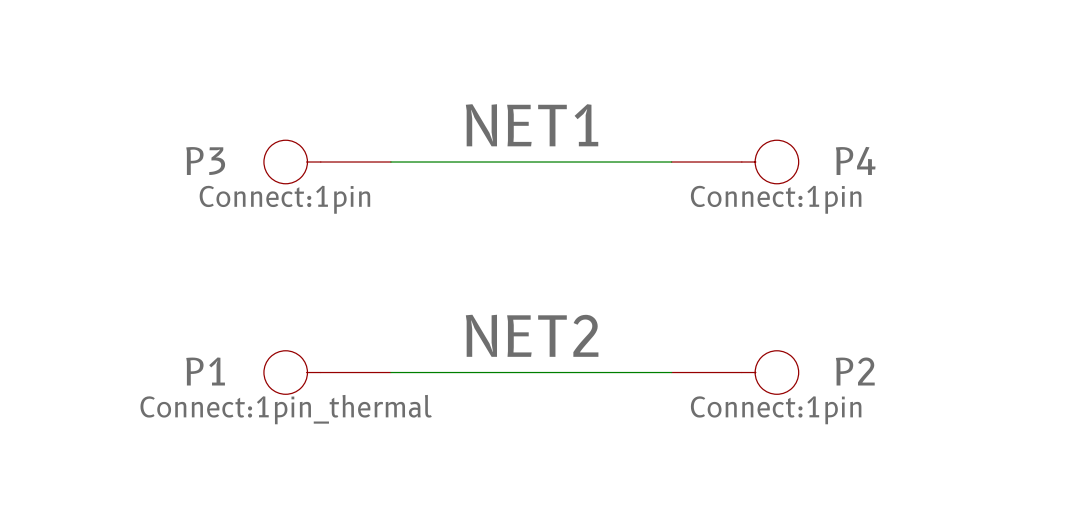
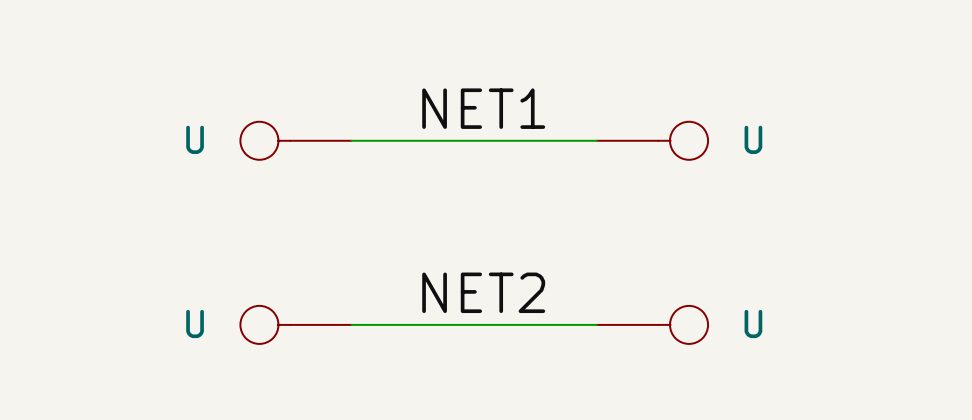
P4 name: P4 (855, 160) -> U (753, 139)
P3 name: P3 (205, 161) -> U (195, 139)
P3 text: Connect:1pin (284, 199) -> none
P4 text: Connect:1pin (776, 199) -> none
P1 name: P1 (205, 371) -> U (195, 323)
P2 name: P2 (855, 371) -> U (753, 323)
P1 text: Connect:1pin_thermal (286, 409) -> none
P2 text: Connect:1pin (776, 410) -> none

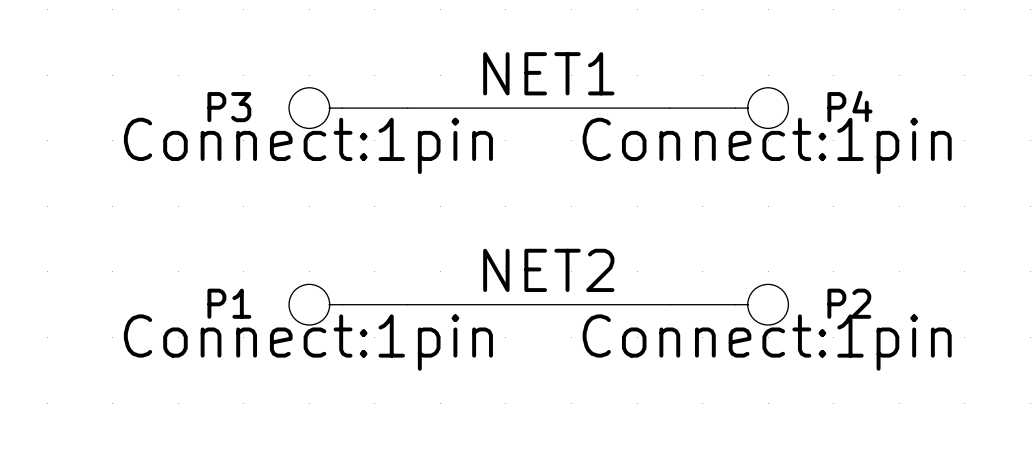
U name: U (195, 139) -> P3 (229, 107)
U name: U (753, 139) -> P4 (849, 106)
U text: none -> Connect:1pin (308, 145)
U text: none -> Connect:1pin (767, 145)
U name: U (195, 323) -> P1 (229, 303)
U name: U (753, 323) -> P2 (849, 303)
U text: none -> Connect:1pin (308, 342)
U text: none -> Connect:1pin (767, 342)

